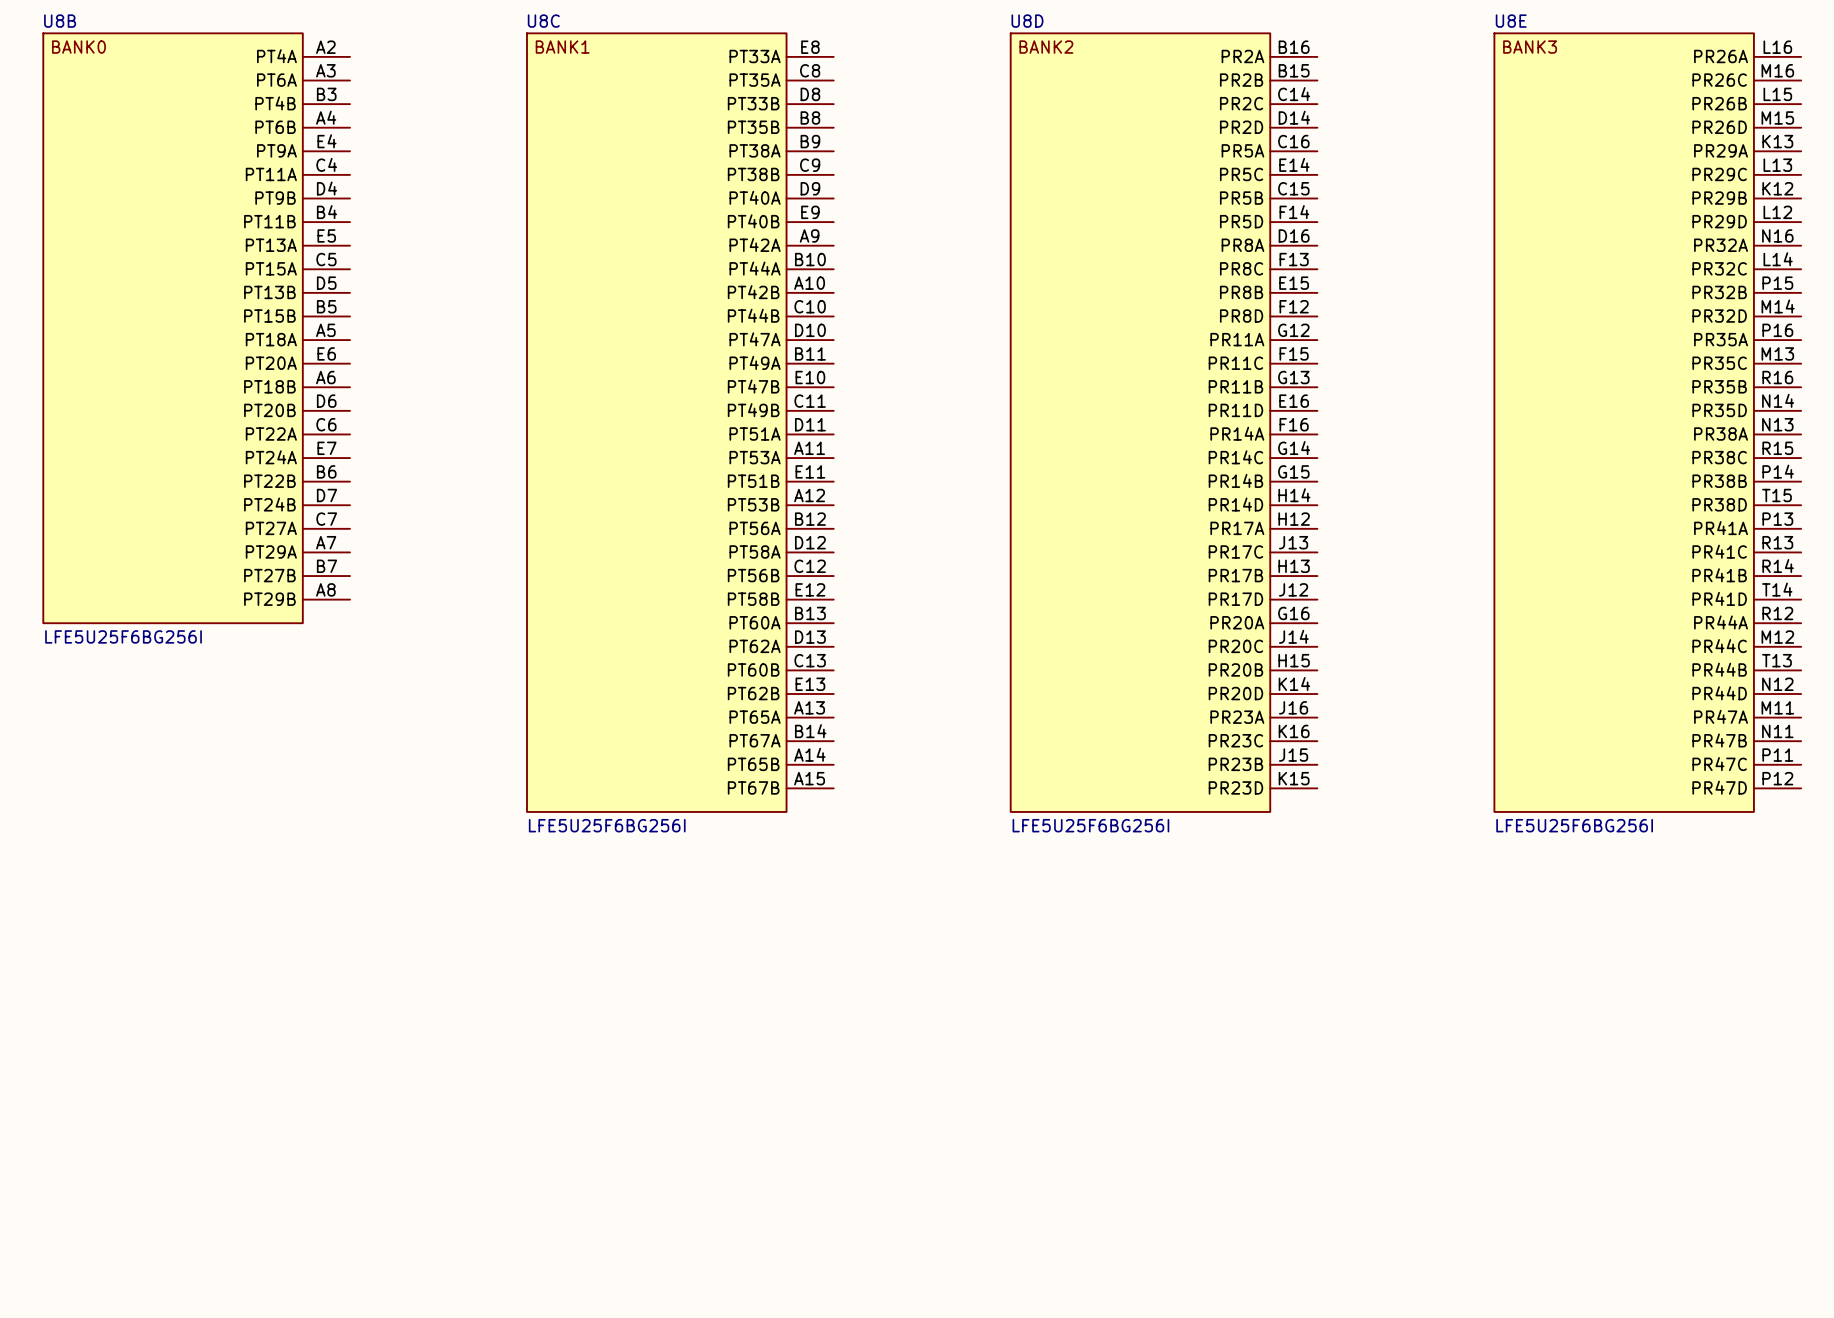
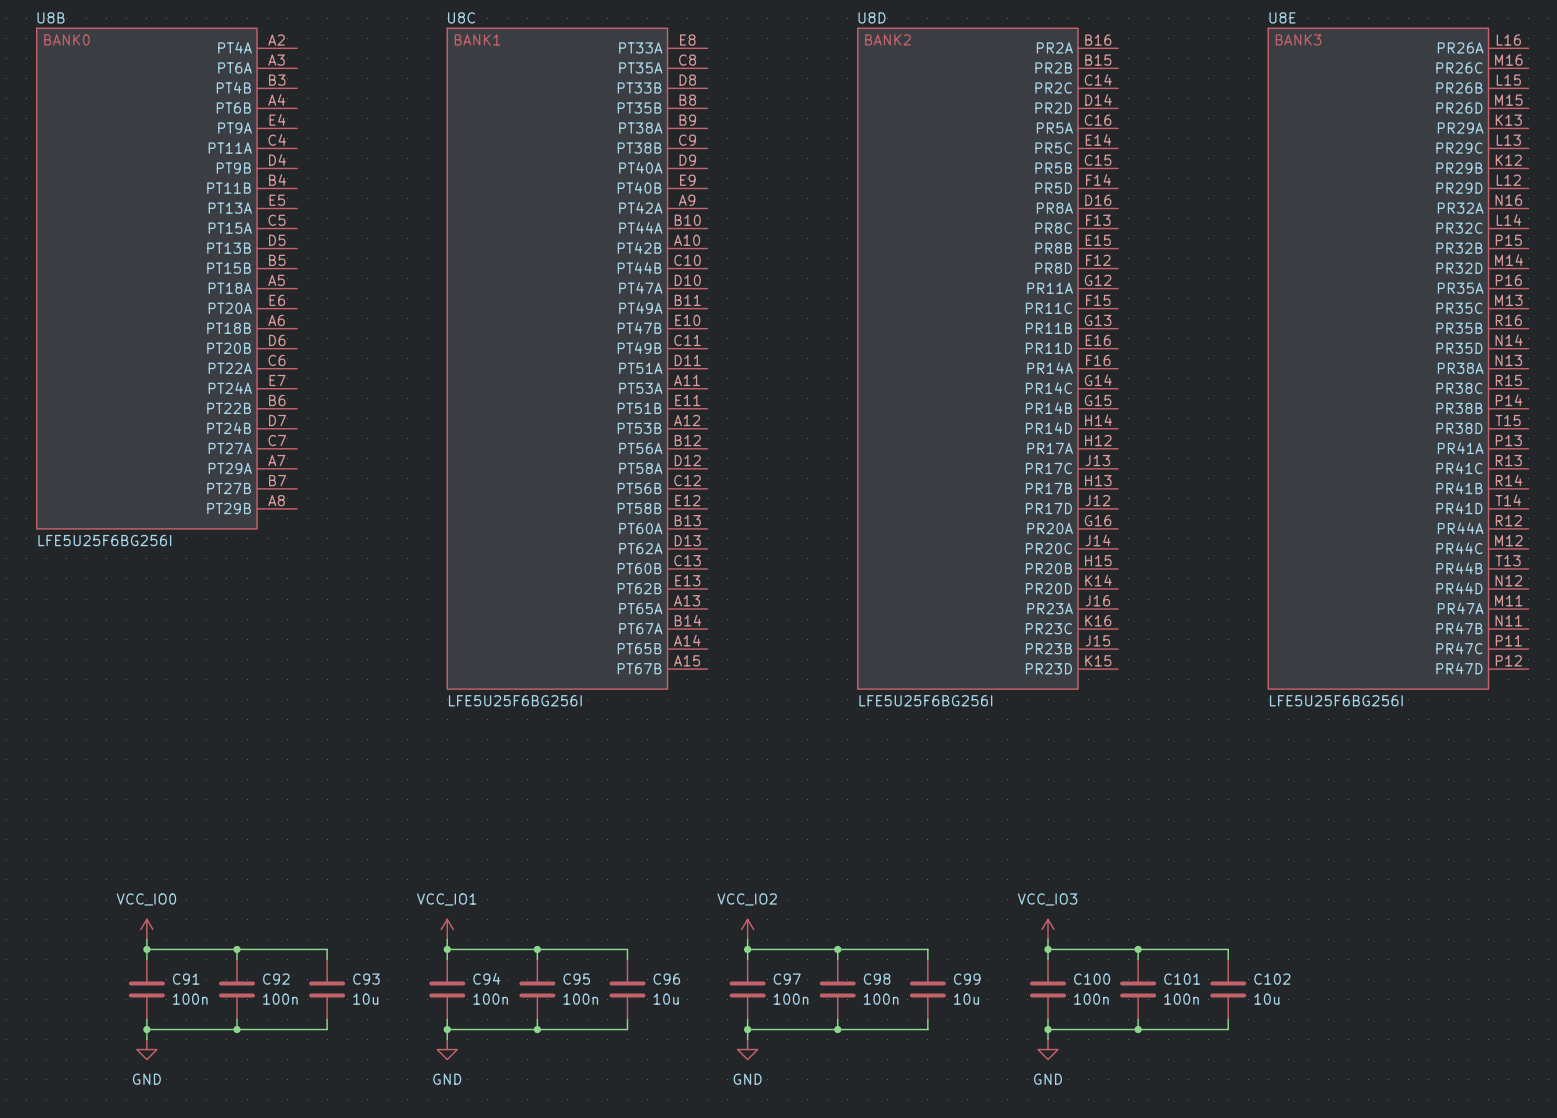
power symbol: none -> VCC_IO0 (146, 929)
power symbol: none -> VCC_IO1 (447, 929)
power symbol: none -> VCC_IO2 (747, 929)
power symbol: none -> VCC_IO3 (1048, 929)
wire: none -> (146, 939) (146, 959)
wire: none -> (447, 939) (447, 959)
wire: none -> (747, 939) (747, 959)
wire: none -> (1048, 939) (1048, 959)
wire: none -> (146, 949) (327, 949) (327, 959)
junction: none -> (146, 949)
wire: none -> (236, 949) (236, 959)
junction: none -> (236, 949)
wire: none -> (447, 949) (627, 949) (627, 959)
junction: none -> (447, 949)
wire: none -> (537, 949) (537, 959)
junction: none -> (537, 949)
wire: none -> (747, 949) (927, 949) (927, 959)
junction: none -> (747, 949)
wire: none -> (837, 949) (837, 959)
junction: none -> (837, 949)
wire: none -> (1048, 949) (1228, 949) (1228, 959)
junction: none -> (1048, 949)
wire: none -> (1138, 949) (1138, 959)
junction: none -> (1138, 949)
C91: none -> 100n (146, 989)
C92: none -> 100n (236, 989)
C93: none -> 10u (327, 989)
C94: none -> 100n (447, 989)
C95: none -> 100n (537, 989)
C96: none -> 10u (627, 989)
C97: none -> 100n (747, 989)
C98: none -> 100n (837, 989)
C99: none -> 10u (927, 989)
C100: none -> 100n (1048, 989)
C101: none -> 100n (1138, 989)
C102: none -> 10u (1228, 989)
wire: none -> (146, 1019) (146, 1039)
wire: none -> (236, 1019) (236, 1029)
wire: none -> (327, 1019) (327, 1029) (146, 1029)
wire: none -> (447, 1019) (447, 1039)
wire: none -> (537, 1019) (537, 1029)
wire: none -> (627, 1019) (627, 1029) (447, 1029)
wire: none -> (747, 1019) (747, 1039)
wire: none -> (837, 1019) (837, 1029)
wire: none -> (927, 1019) (927, 1029) (747, 1029)
wire: none -> (1048, 1019) (1048, 1039)
wire: none -> (1138, 1019) (1138, 1029)
wire: none -> (1228, 1019) (1228, 1029) (1048, 1029)
junction: none -> (146, 1029)
junction: none -> (236, 1029)
junction: none -> (447, 1029)
junction: none -> (537, 1029)
junction: none -> (747, 1029)
junction: none -> (837, 1029)
junction: none -> (1048, 1029)
junction: none -> (1138, 1029)
power symbol: none -> GND (146, 1049)
power symbol: none -> GND (447, 1049)
power symbol: none -> GND (747, 1049)
power symbol: none -> GND (1048, 1049)

